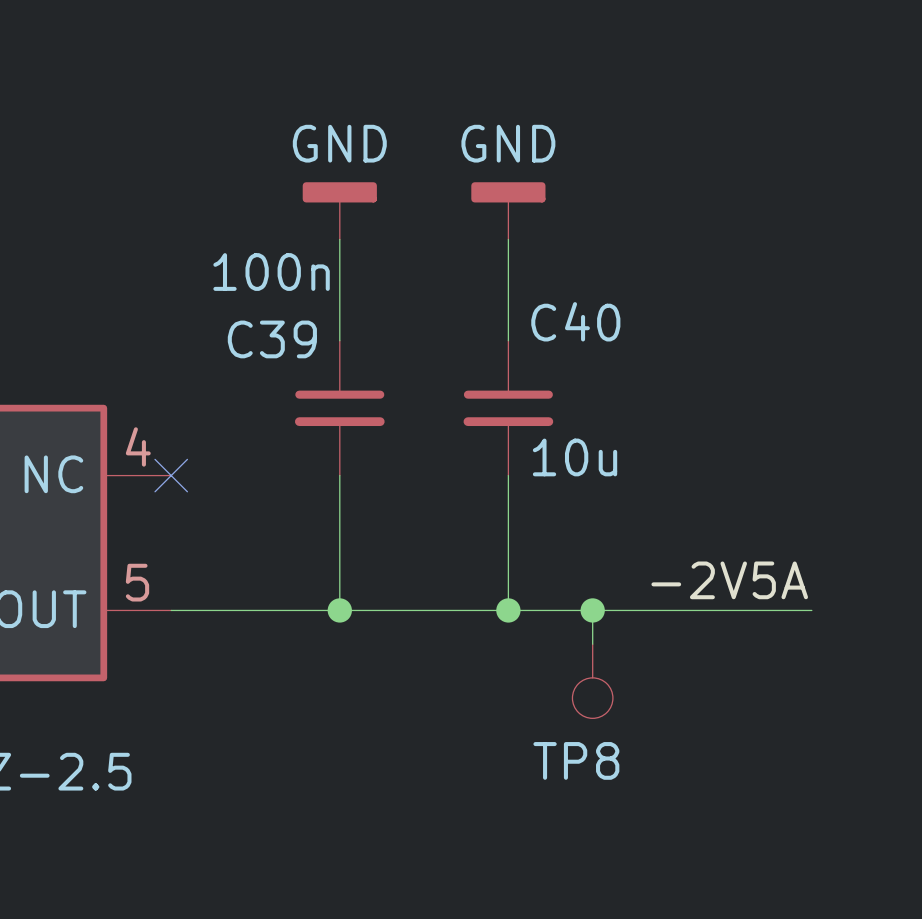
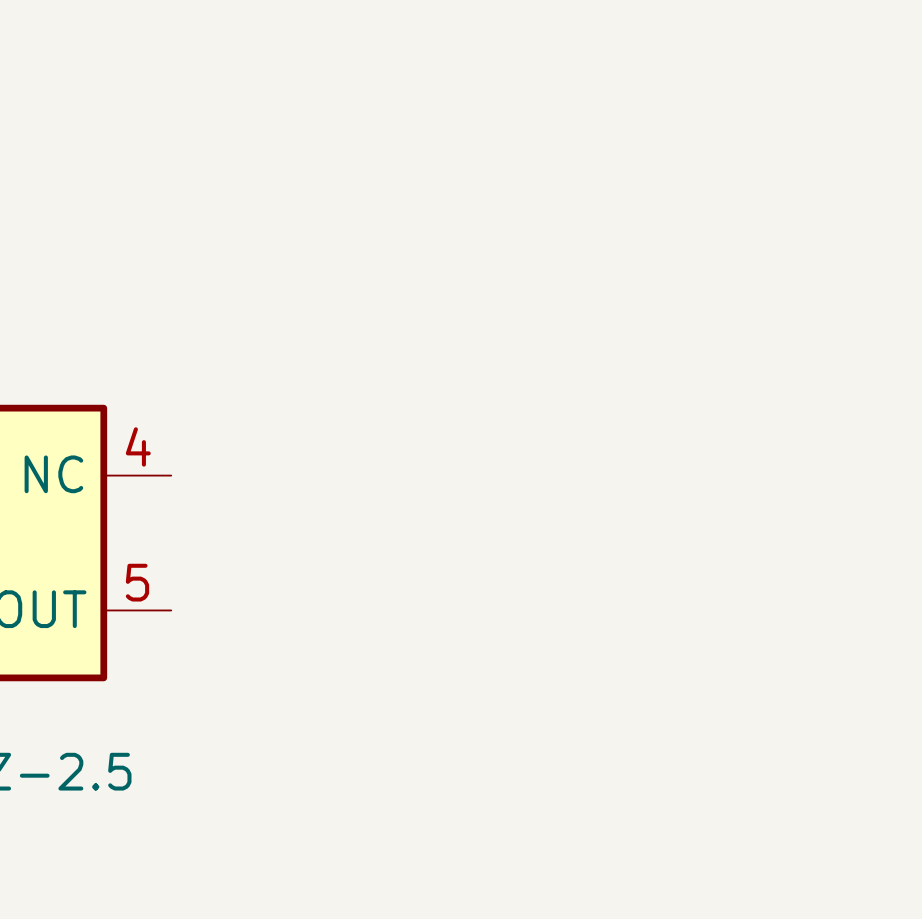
power symbol: GND (339, 210) -> none
power symbol: GND (508, 210) -> none
wire: (339, 239) (339, 340) -> none
wire: (508, 239) (508, 340) -> none
C39: 100n (339, 408) -> none
C40: 10u (508, 408) -> none
no-connect mark: (171, 475) -> none
wire: (339, 475) (339, 610) -> none
wire: (508, 475) (508, 610) -> none
label: -2V5A (729, 580) -> none
wire: (171, 610) (811, 610) -> none
junction: (339, 610) -> none
junction: (508, 610) -> none
wire: (592, 610) (592, 644) -> none
junction: (592, 610) -> none
TP8: (592, 681) -> none

